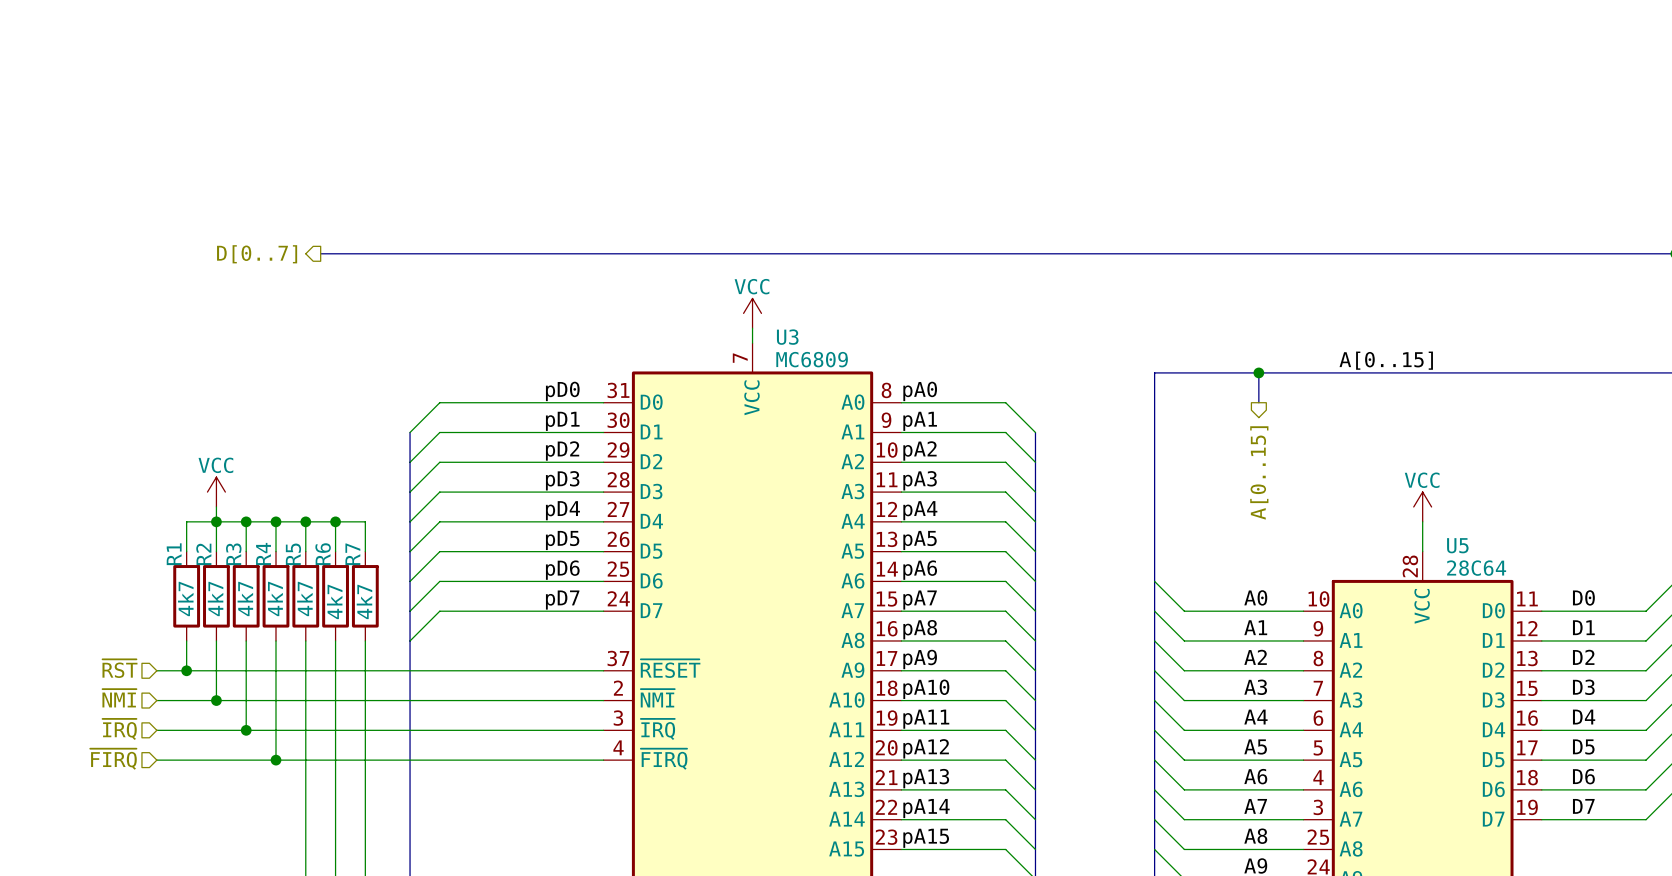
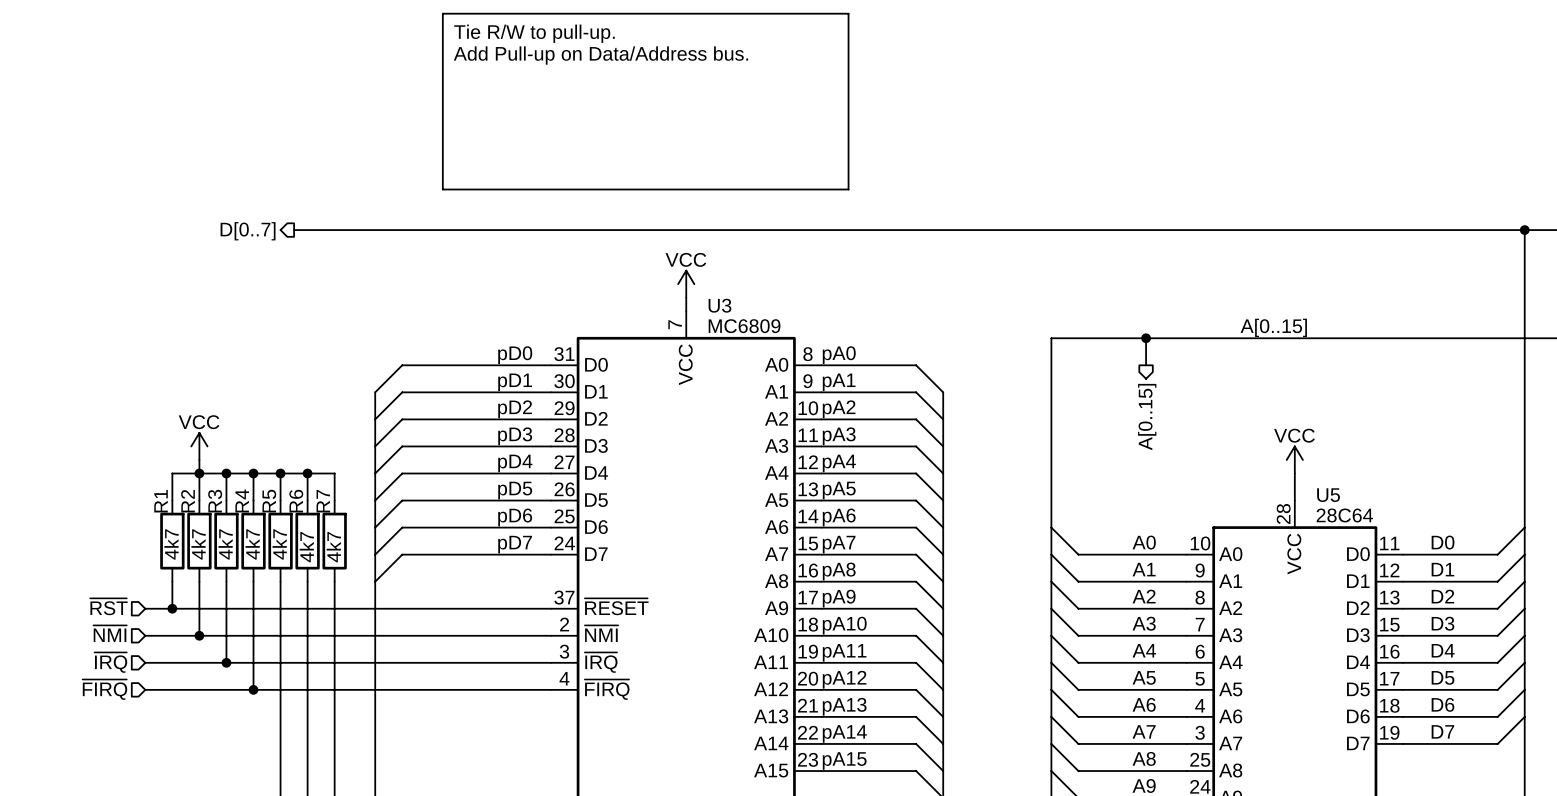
line: none -> (442, 13) (848, 13) (848, 189) (442, 189) (442, 13)
text: none -> Tie R/W to pull-up. (534, 33)
text: none -> Add Pull-up on Data/Address bus. (600, 55)

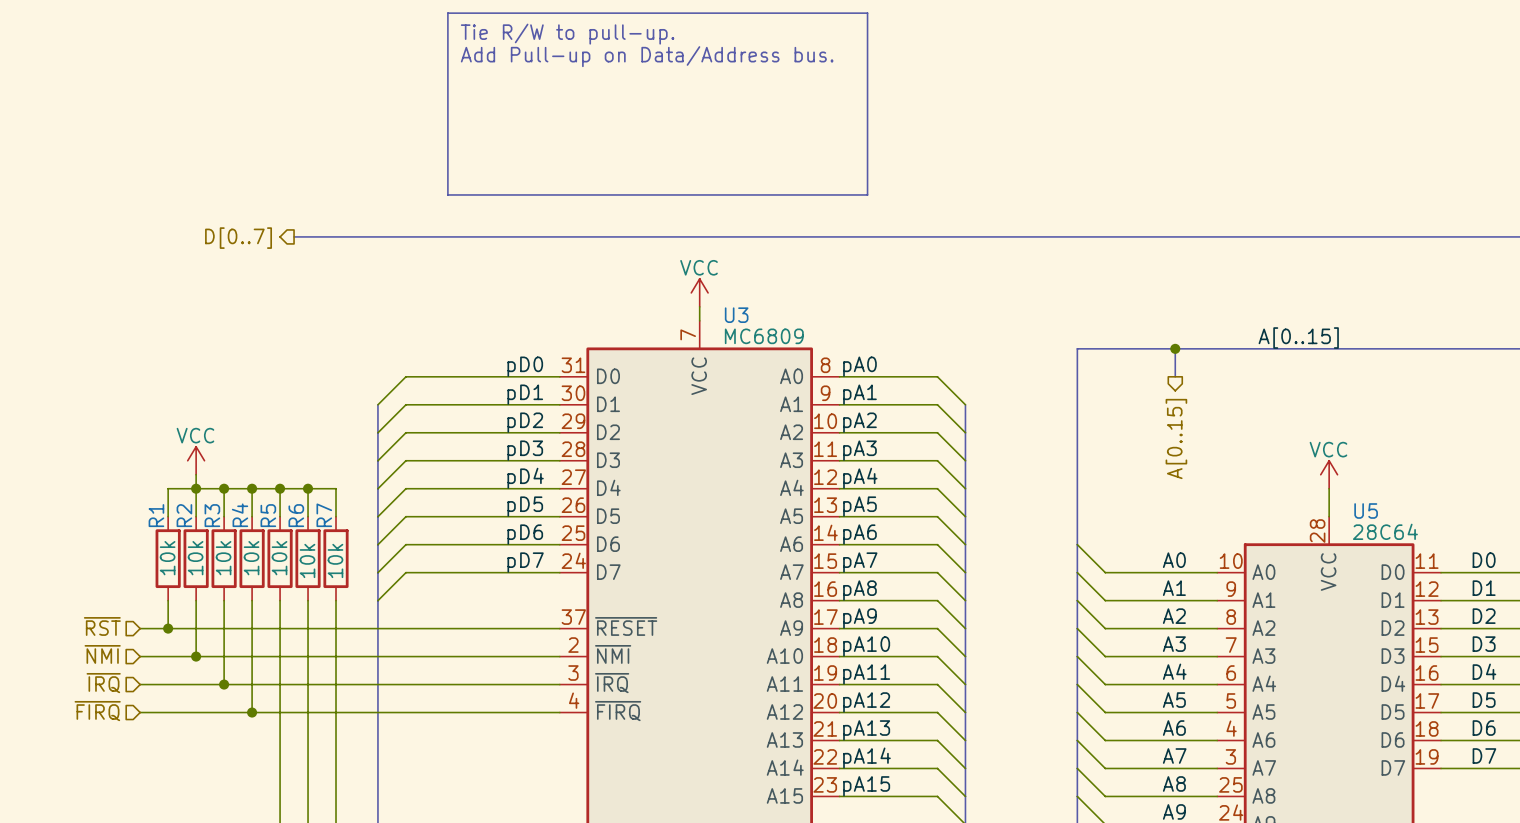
R1 value: 4k7 (171, 544) -> 10k (167, 558)
R2 value: 4k7 (198, 544) -> 10k (195, 558)
R3 value: 4k7 (225, 544) -> 10k (223, 558)
R4 value: 4k7 (252, 544) -> 10k (251, 558)
R5 value: 4k7 (279, 544) -> 10k (279, 558)
R6 value: 4k7 (306, 547) -> 10k (307, 560)
R7 value: 4k7 (333, 547) -> 10k (335, 560)

